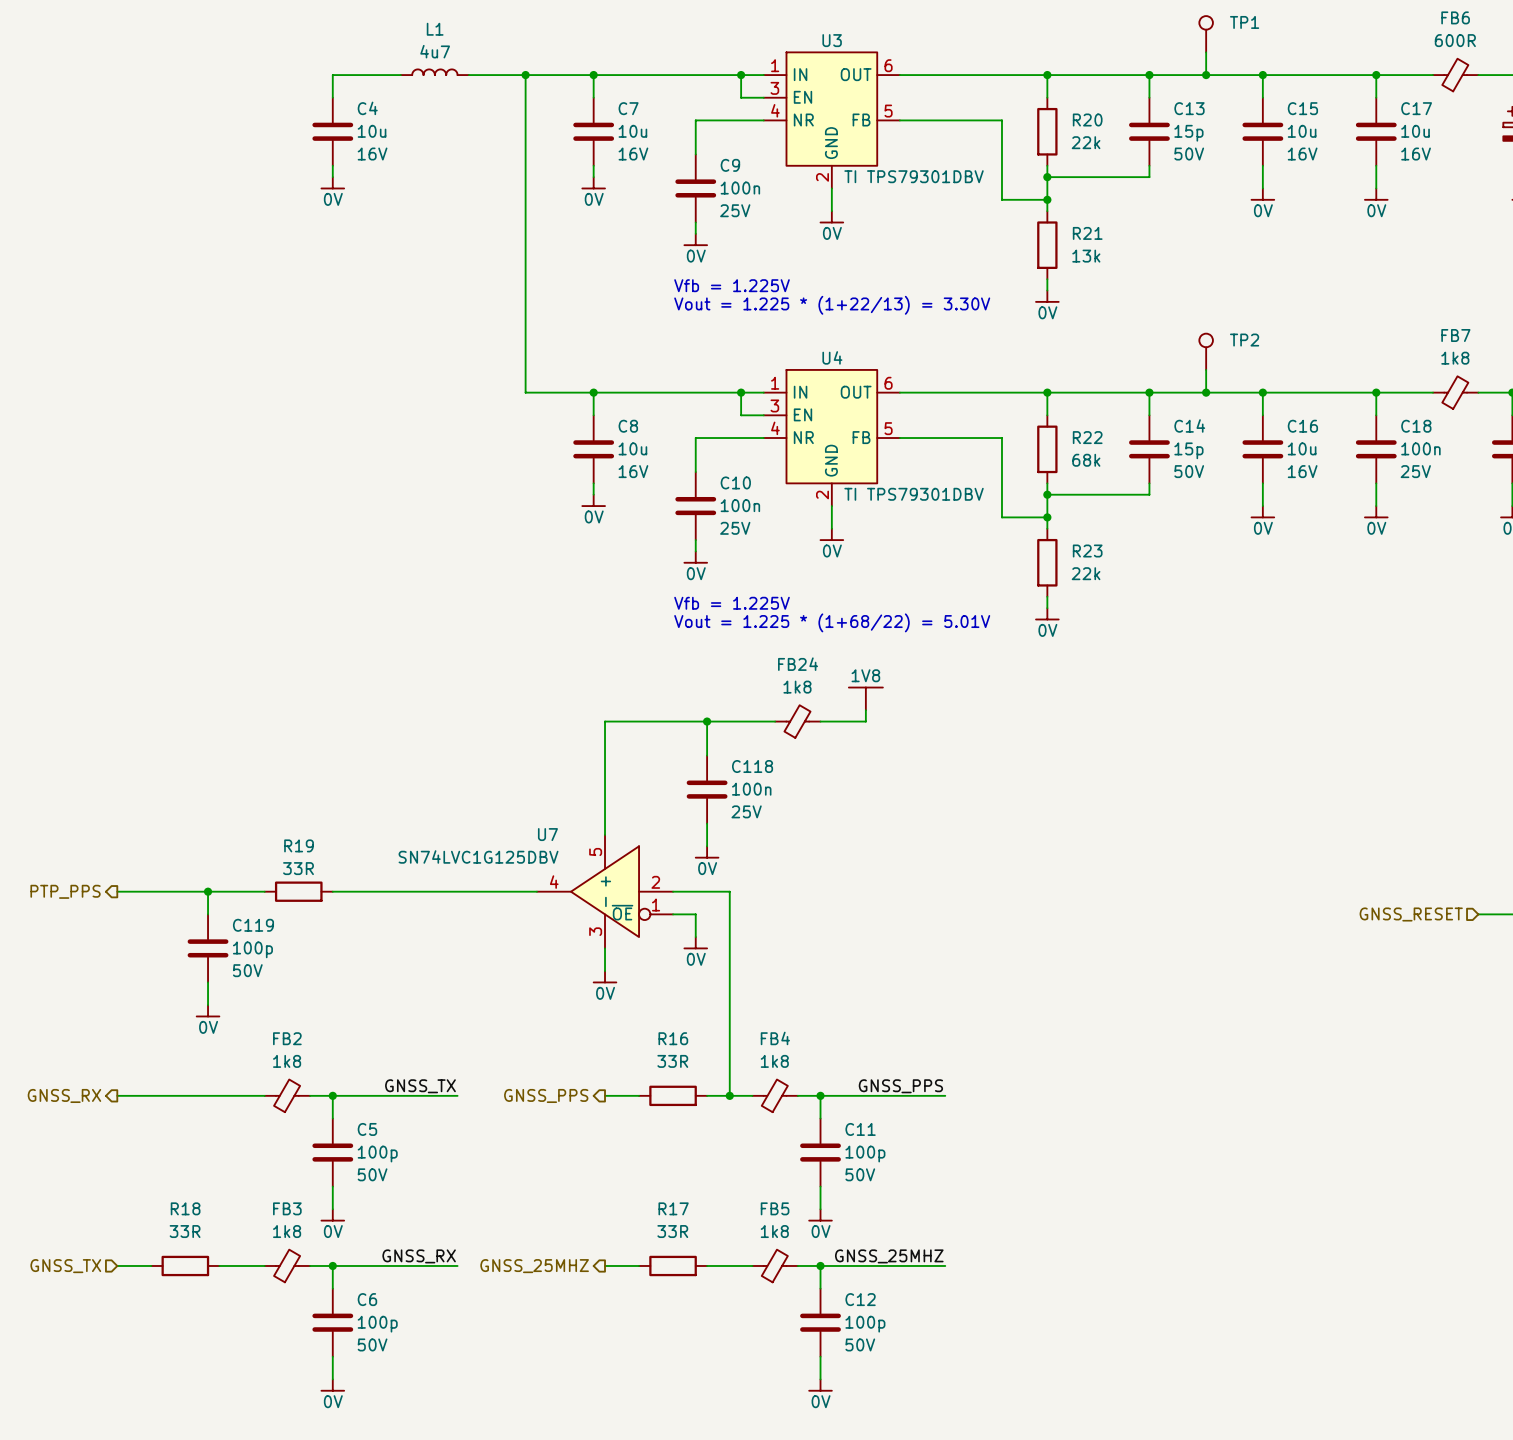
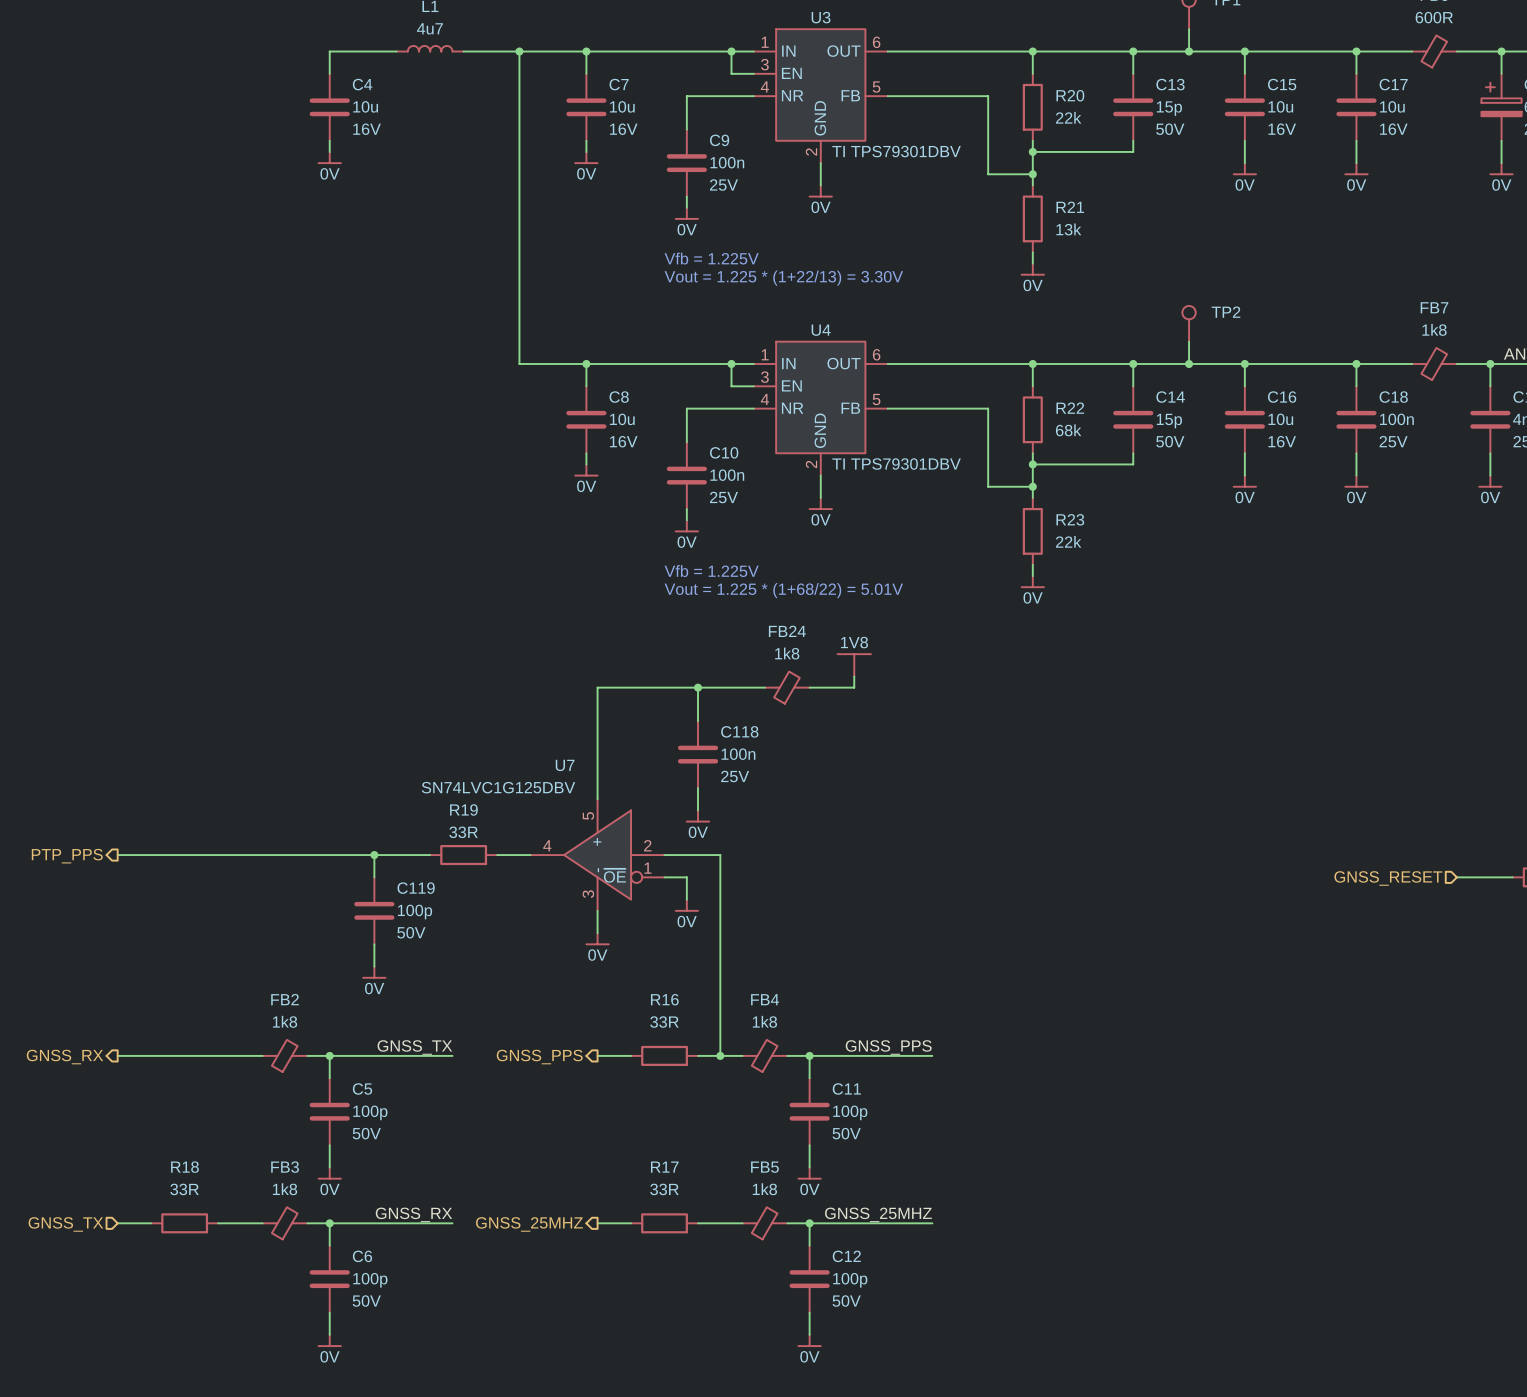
U7 name position: U7 (547, 834) -> U7 (565, 765)
U7 value position: SN74LVC1G125DBV (478, 856) -> SN74LVC1G125DBV (498, 787)
wire: (208, 891) (208, 914) -> (374, 855) (374, 877)
junction: (208, 891) -> none
R19 position: (298, 891) -> (463, 855)
junction: none -> (374, 855)
wire: (434, 891) (502, 891) -> (262, 855) (329, 855)
C119 position: (208, 948) -> (374, 910)
wire: (208, 982) (208, 1005) -> (374, 944) (374, 966)
power symbol position: 0V (208, 1010) -> 0V (374, 972)

